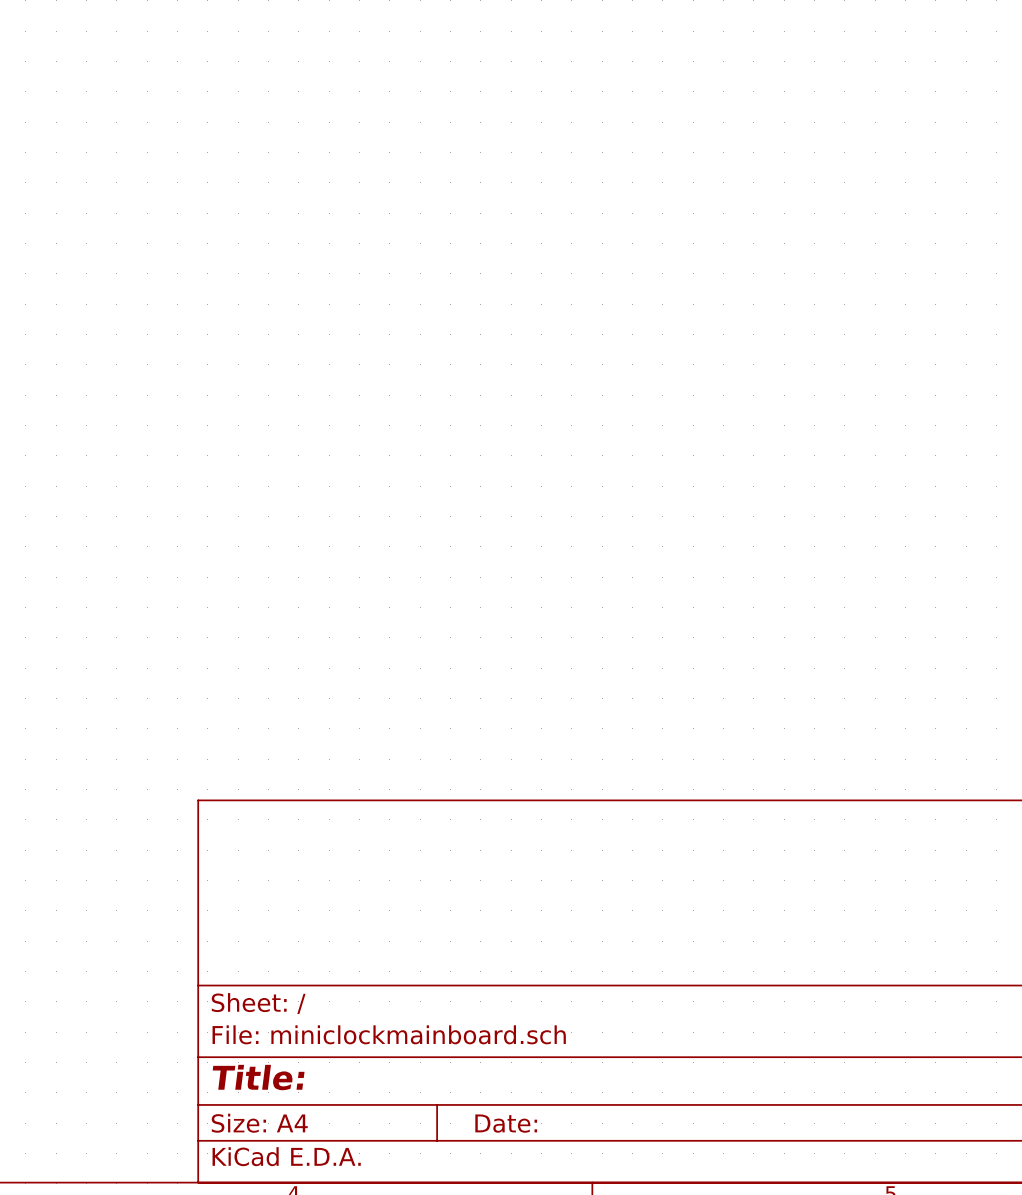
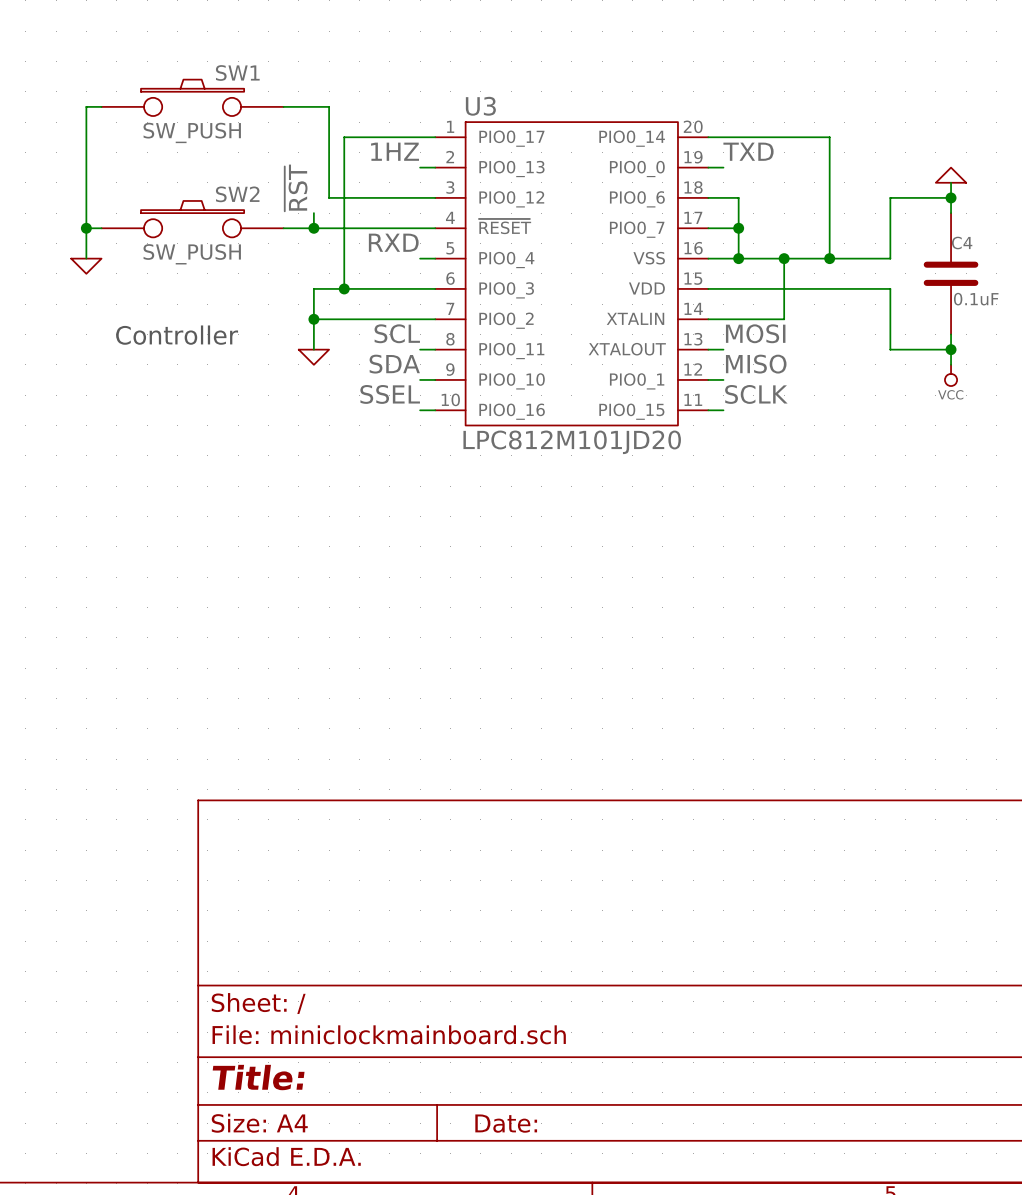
SW1: none -> SW_PUSH (192, 97)
wire: none -> (101, 106) (86, 106) (86, 258)
wire: none -> (283, 106) (329, 106) (329, 197) (435, 197)
wire: none -> (435, 137) (344, 137) (344, 288)
wire: none -> (708, 137) (829, 137) (829, 258)
label: none -> 1HZ (395, 151)
label: none -> TXD (748, 151)
wire: none -> (420, 167) (435, 167)
wire: none -> (708, 167) (723, 167)
power symbol: none -> (951, 175)
wire: none -> (951, 182) (951, 213)
label: none -> ~{RST} (296, 187)
wire: none -> (708, 197) (738, 197) (738, 258)
wire: none -> (951, 197) (890, 197) (890, 258) (708, 258)
junction: none -> (951, 197)
wire: none -> (313, 213) (313, 228)
SW2: none -> SW_PUSH (192, 219)
wire: none -> (86, 228) (101, 228)
junction: none -> (86, 228)
wire: none -> (283, 228) (435, 228)
junction: none -> (313, 228)
wire: none -> (708, 228) (738, 228)
junction: none -> (738, 228)
label: none -> RXD (393, 242)
wire: none -> (420, 258) (435, 258)
junction: none -> (738, 258)
wire: none -> (784, 258) (784, 319) (708, 319)
junction: none -> (784, 258)
junction: none -> (829, 258)
power symbol: none -> (86, 266)
U3: none -> LPC812M101JD20 (571, 273)
C4: none -> 0.1uF (951, 273)
junction: none -> (344, 288)
wire: none -> (435, 288) (313, 288) (313, 349)
wire: none -> (708, 288) (890, 288) (890, 349) (951, 349)
wire: none -> (313, 319) (435, 319)
junction: none -> (313, 319)
label: none -> SCL (397, 333)
label: none -> MOSI (755, 333)
wire: none -> (951, 334) (951, 364)
text: none -> Controller (177, 335)
wire: none -> (420, 349) (435, 349)
wire: none -> (708, 349) (723, 349)
junction: none -> (951, 349)
power symbol: none -> (313, 357)
label: none -> SDA (394, 364)
label: none -> MISO (756, 364)
power symbol: none -> VCC (951, 375)
wire: none -> (420, 379) (435, 379)
wire: none -> (708, 379) (723, 379)
label: none -> SSEL (390, 394)
label: none -> SCLK (756, 394)
wire: none -> (420, 410) (435, 410)
wire: none -> (708, 410) (723, 410)

